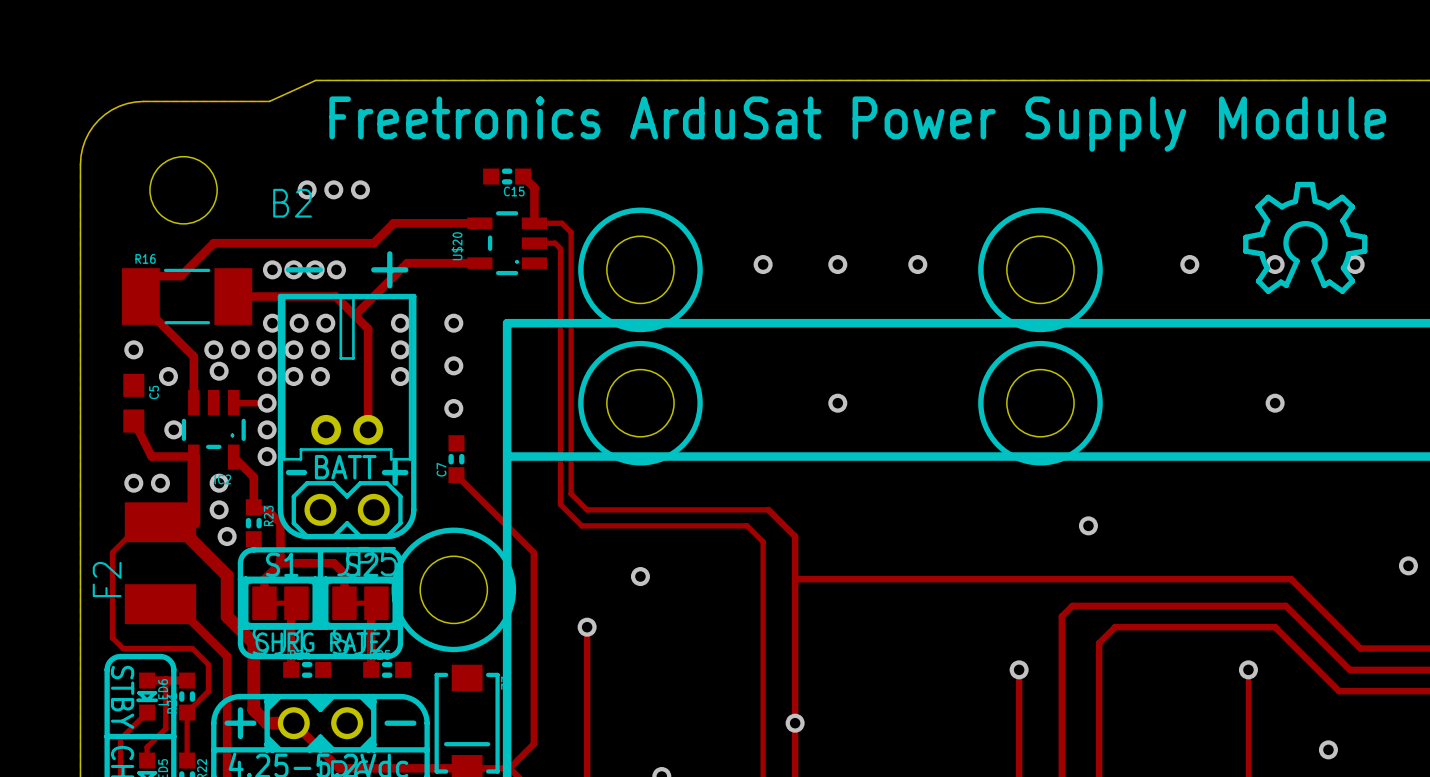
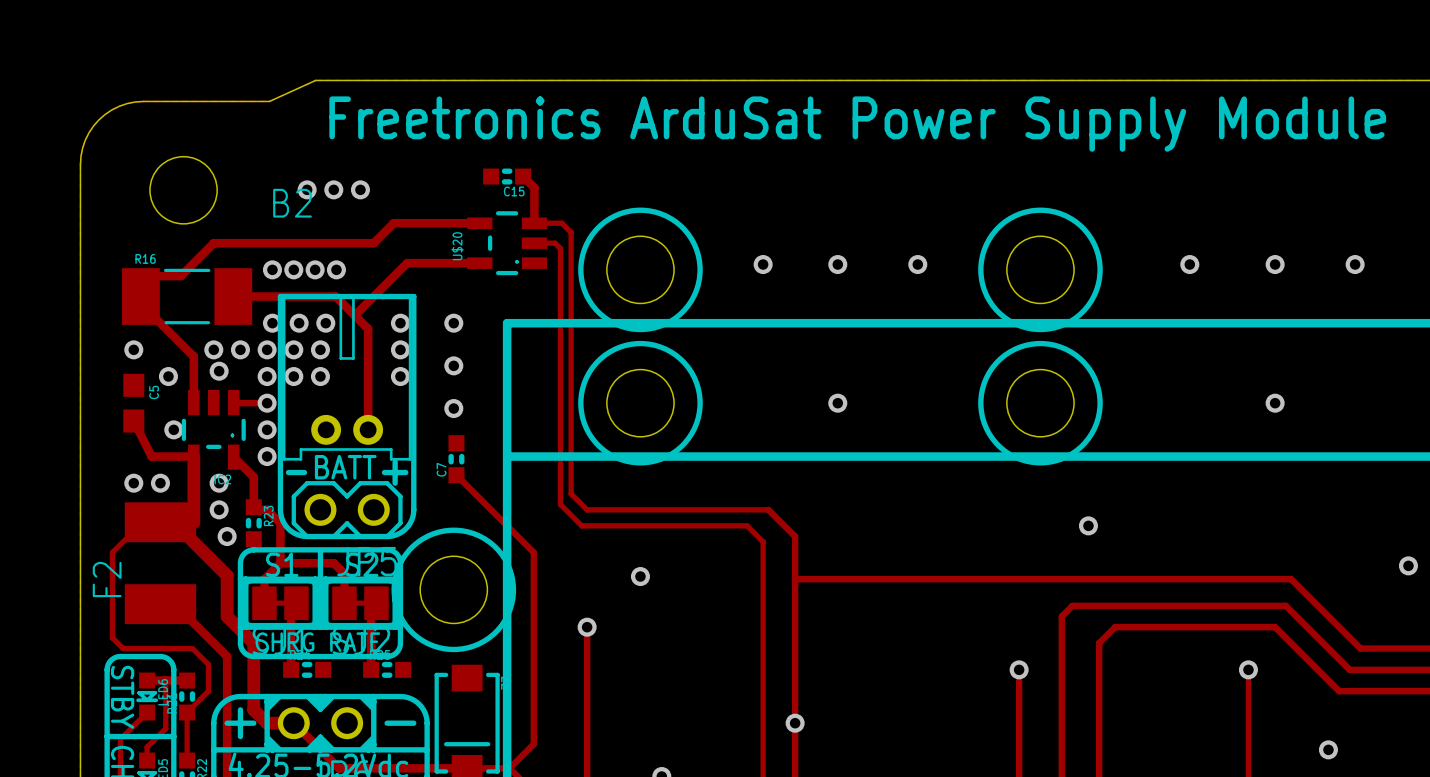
drawing: [1243, 181, 1368, 294] -> none
line: (389, 253) (389, 285) -> none
line: (288, 269) (320, 269) -> none
line: (373, 269) (405, 269) -> none

